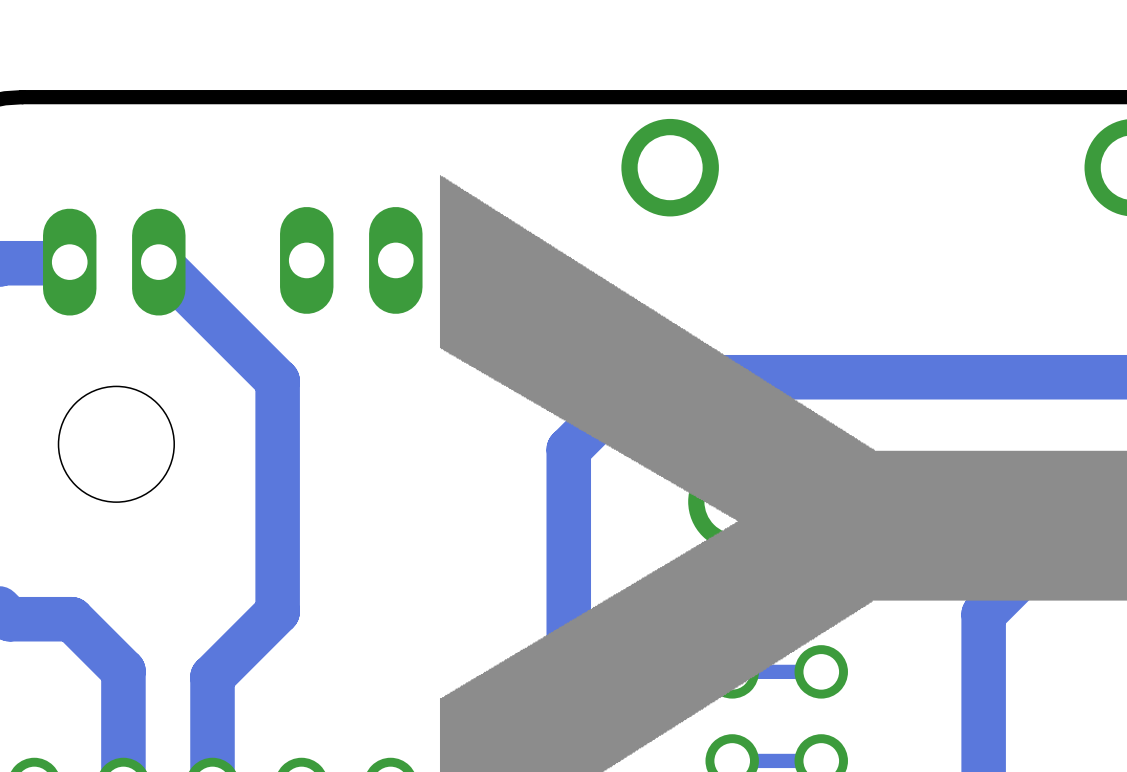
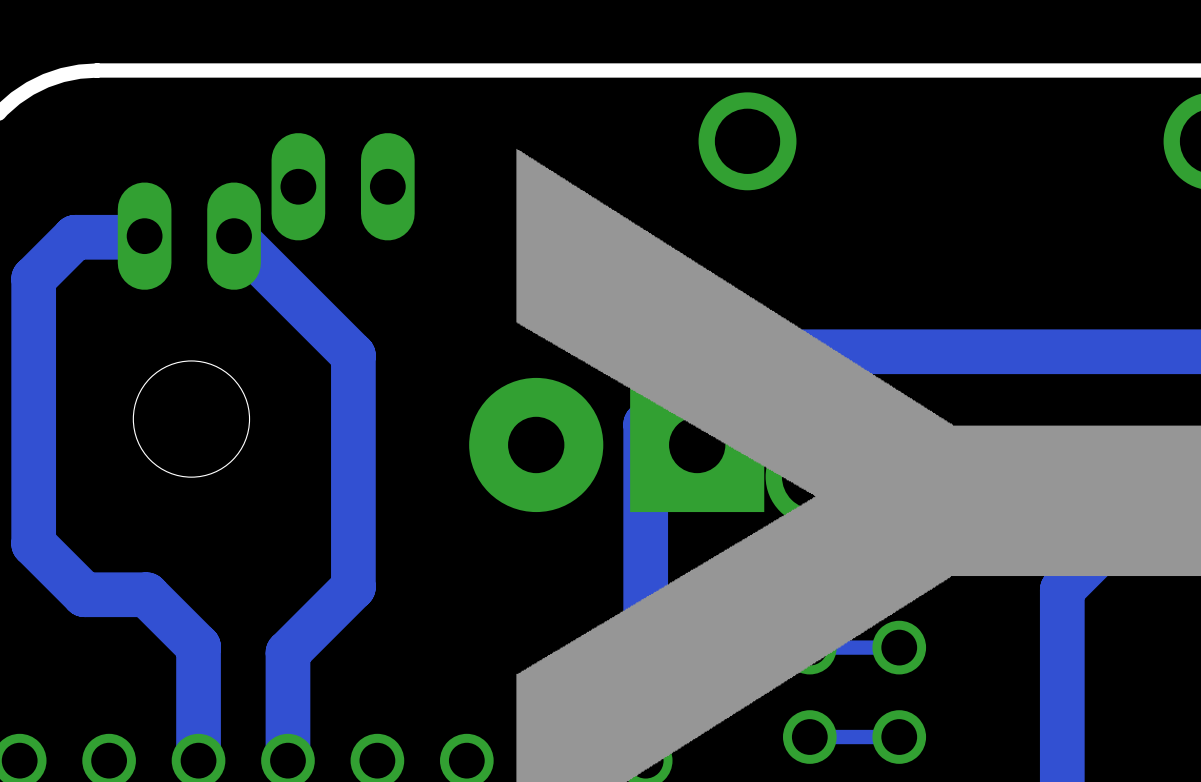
part position: (351, 260) -> (343, 186)
part: none -> (616, 444)

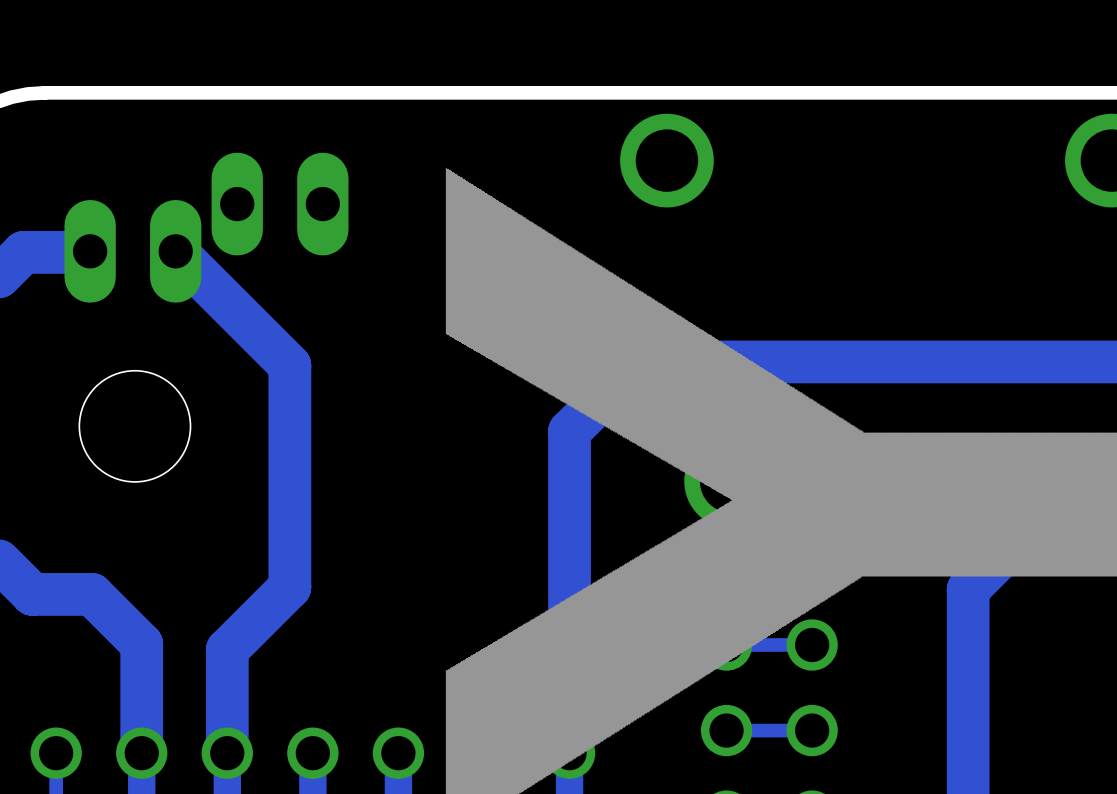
part: (616, 444) -> none

